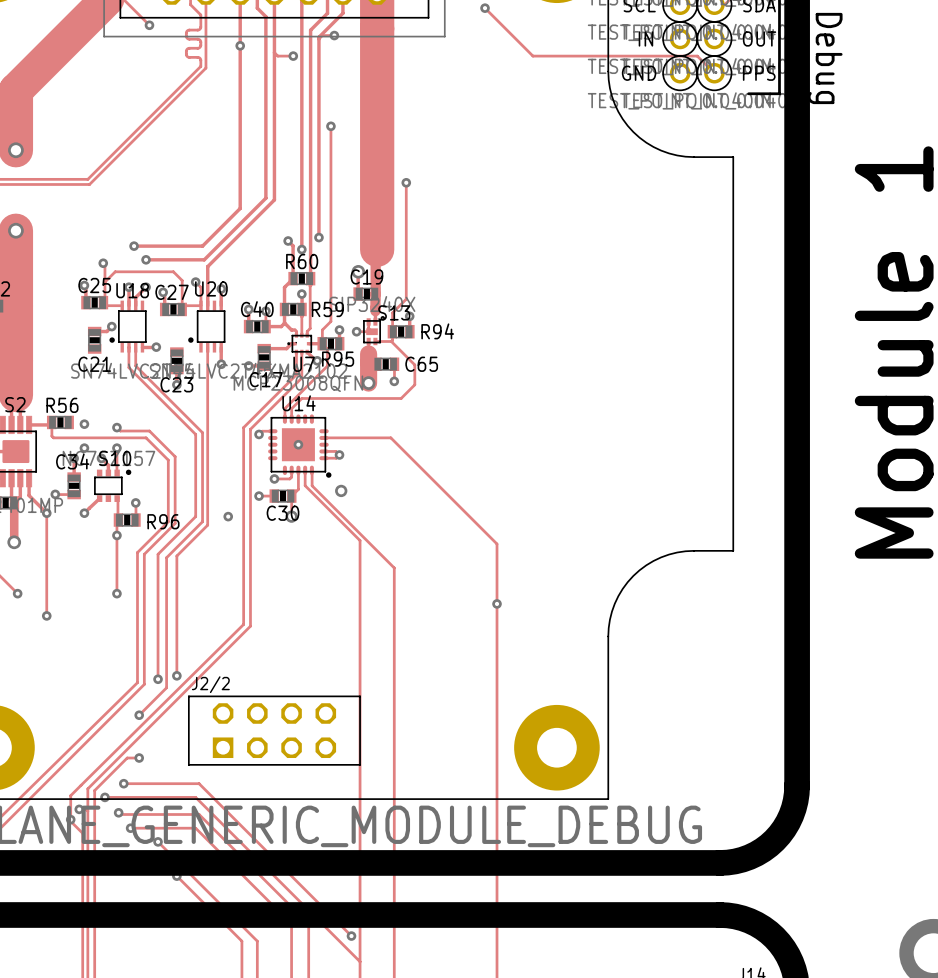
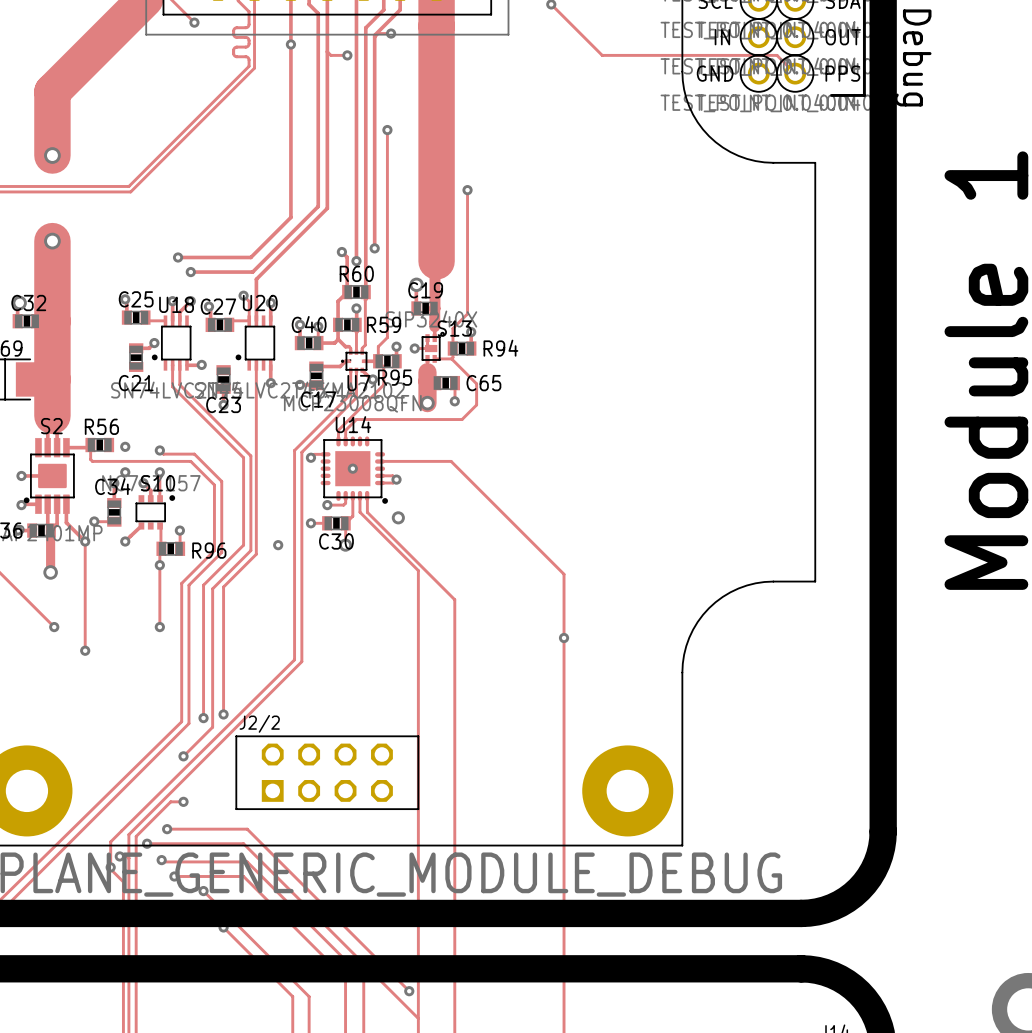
track: (103, 263) (104, 264) (103, 302) -> none
via: (103, 263) -> none
track: (104, 282) (115, 271) (173, 271) (182, 280) (182, 309) -> none

